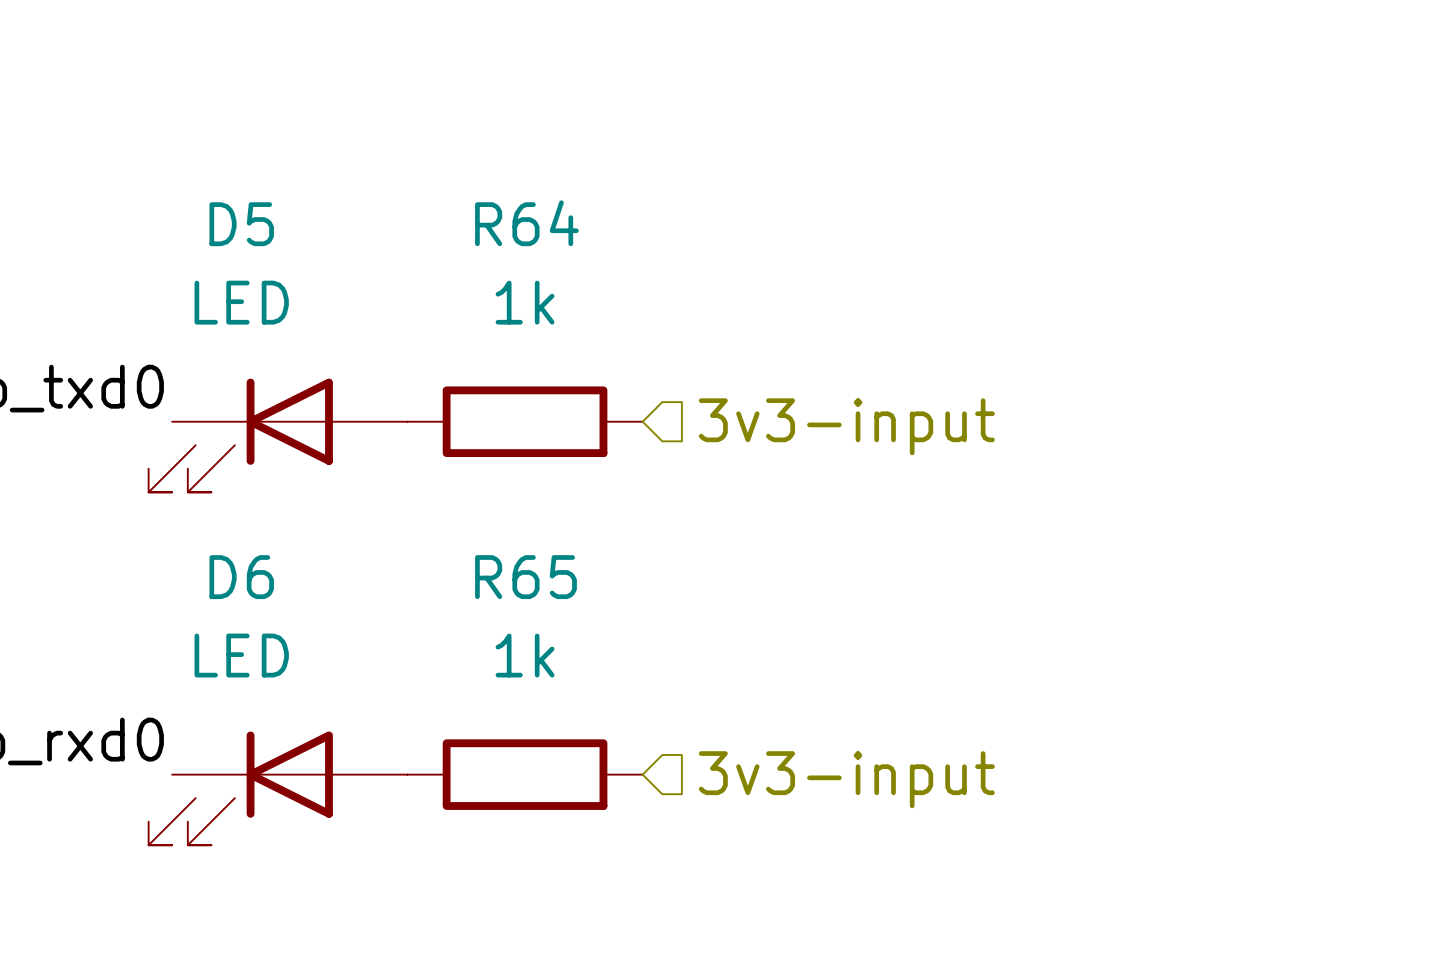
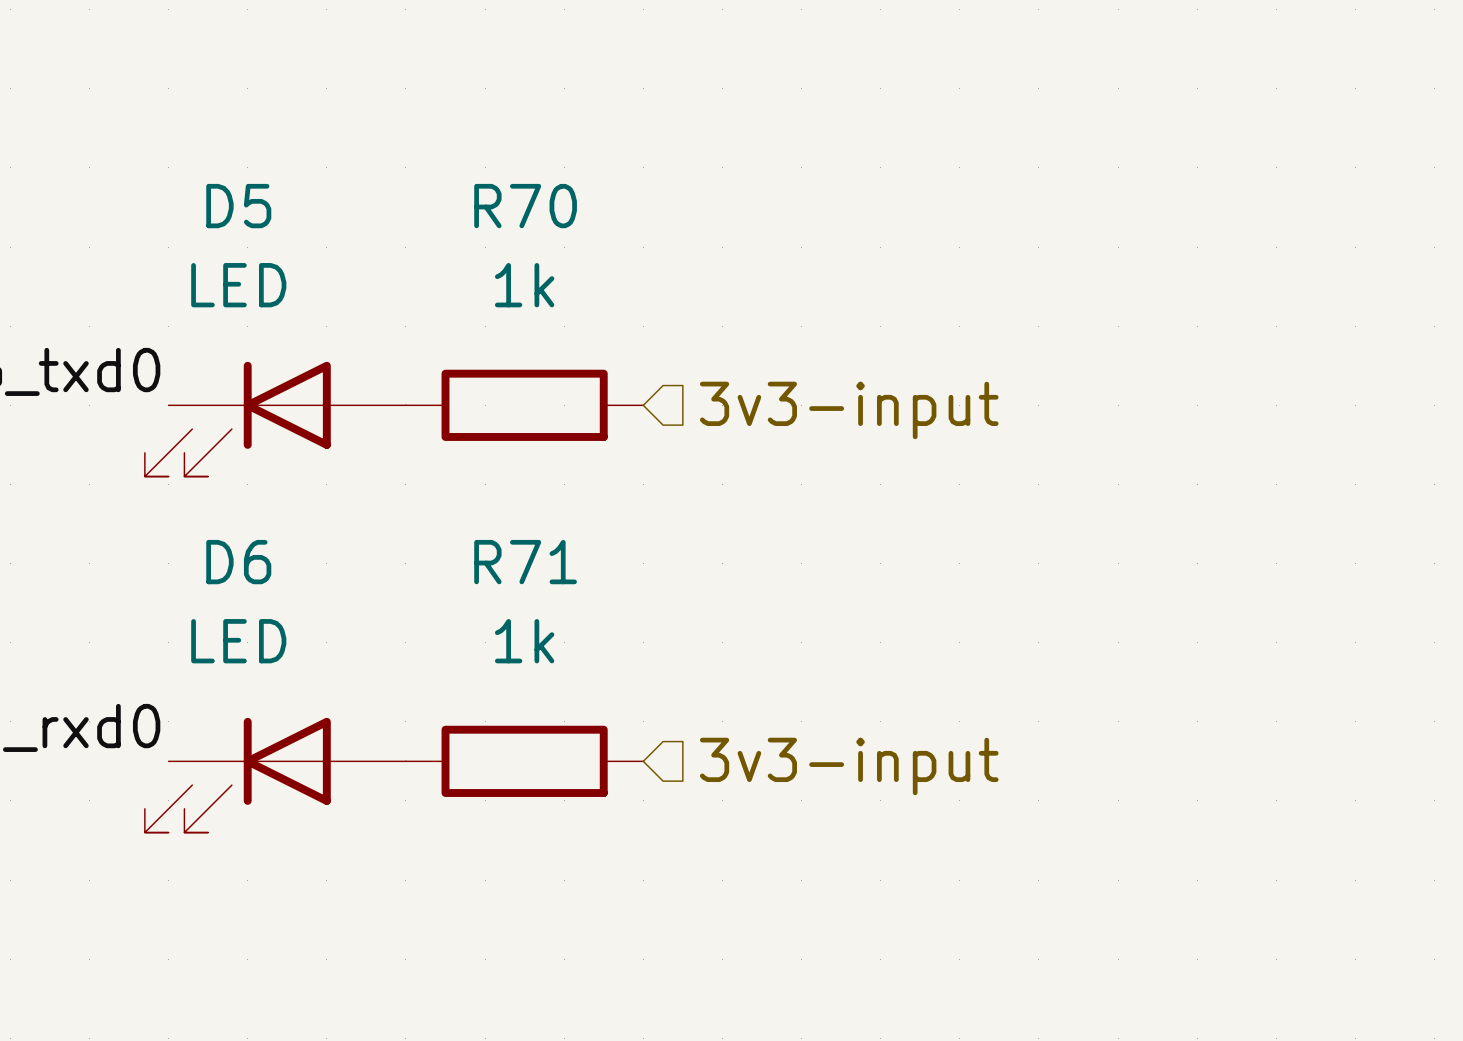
R64 name: R64 (526, 223) -> R70 (525, 206)
R65 name: R65 (525, 577) -> R71 (525, 562)

